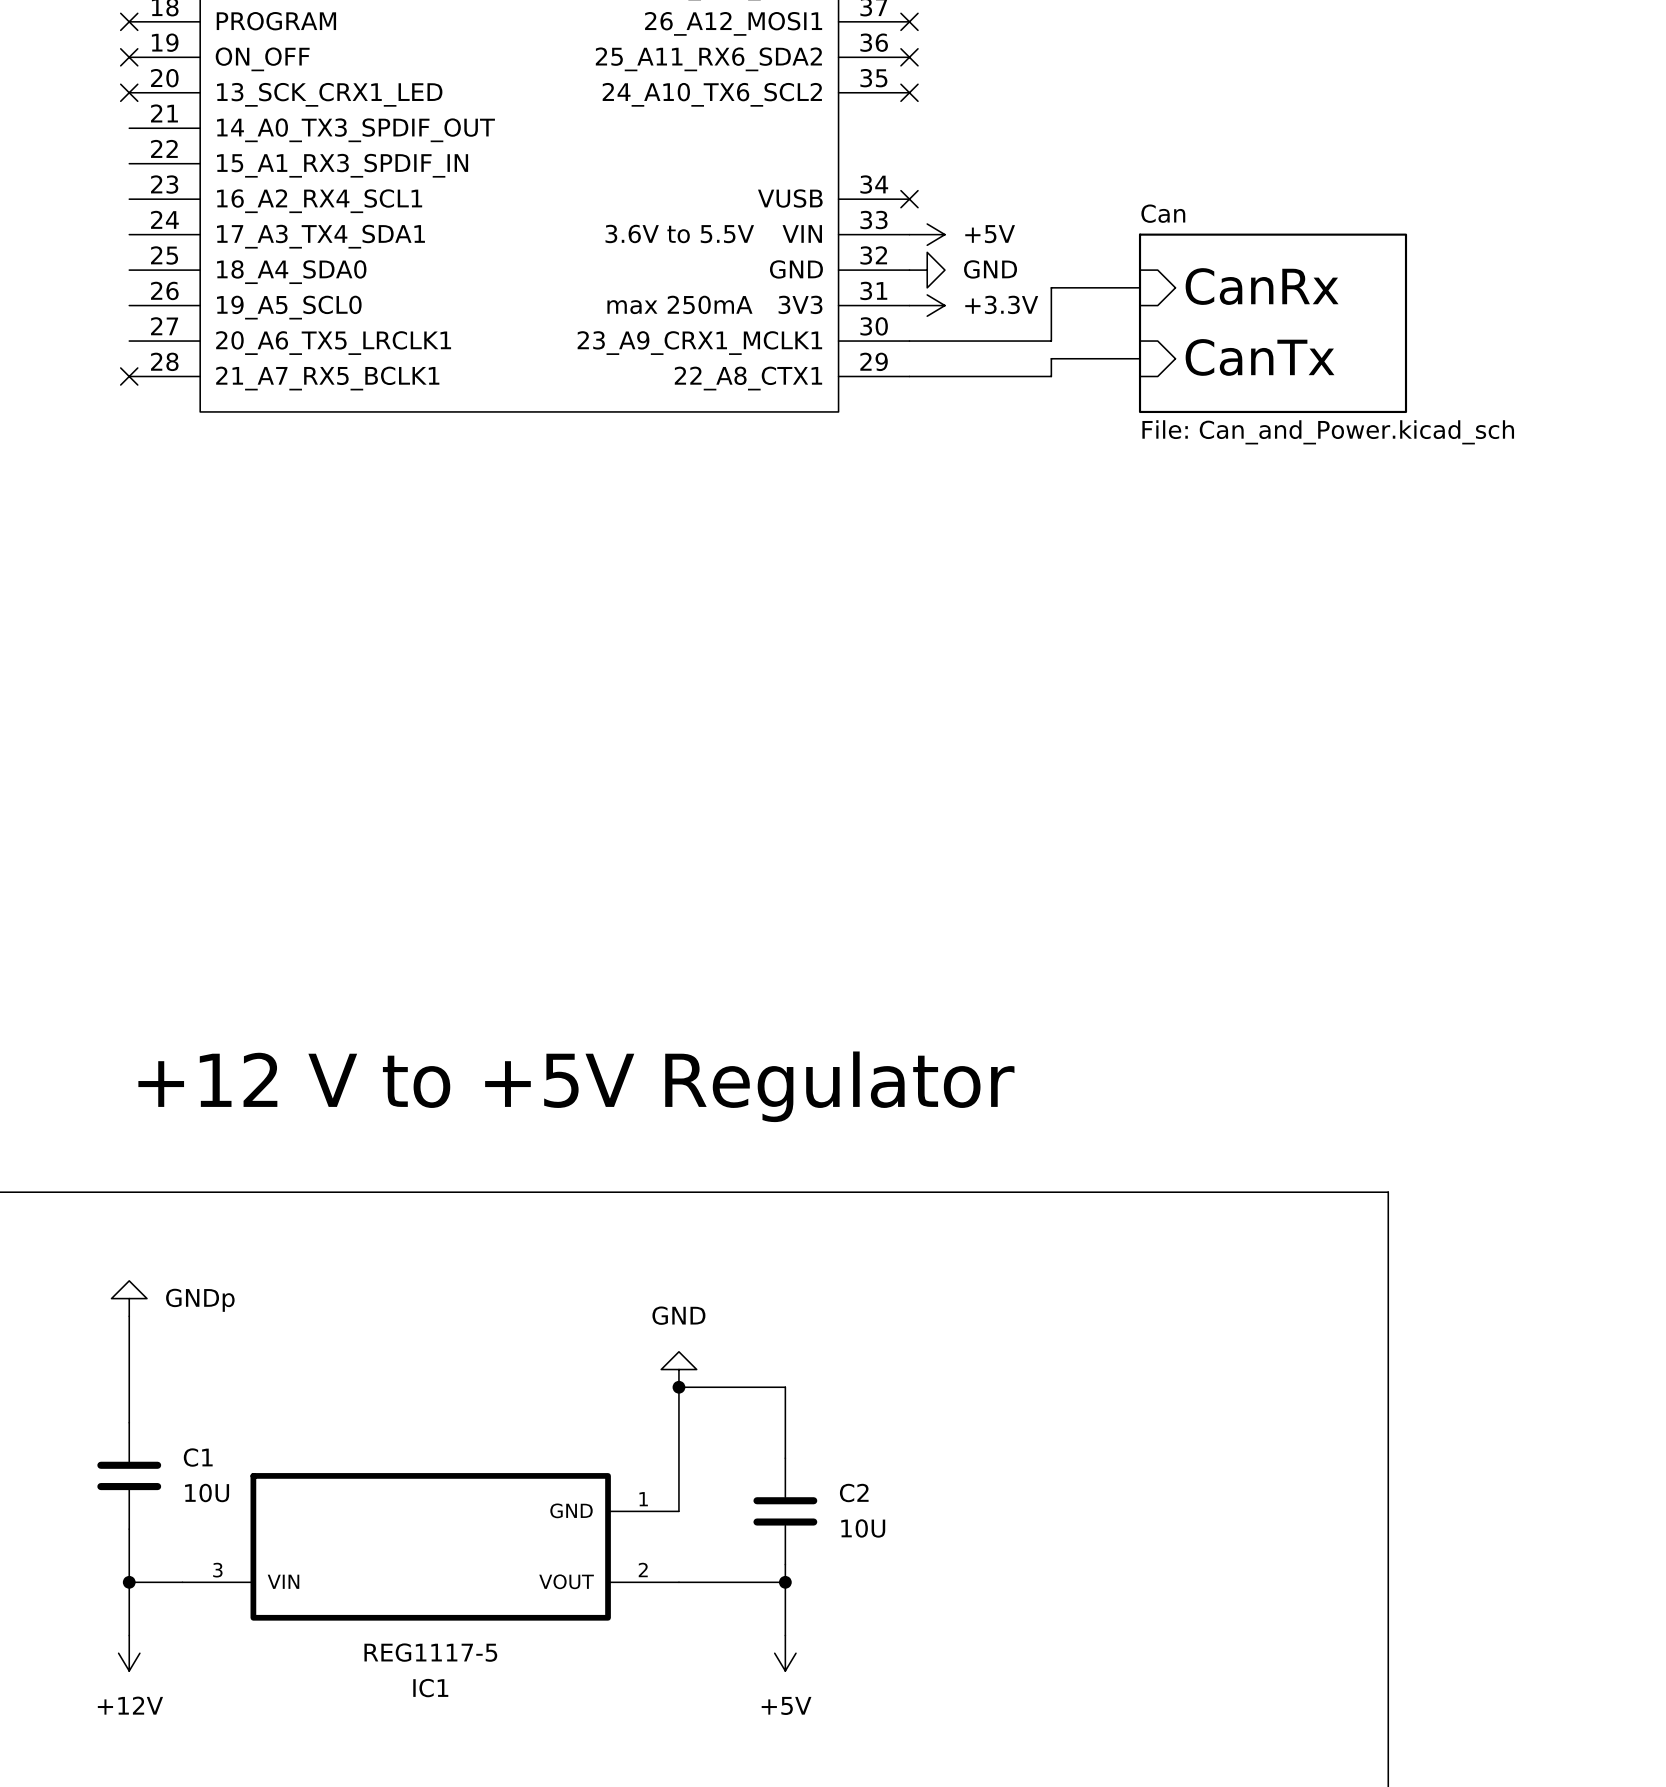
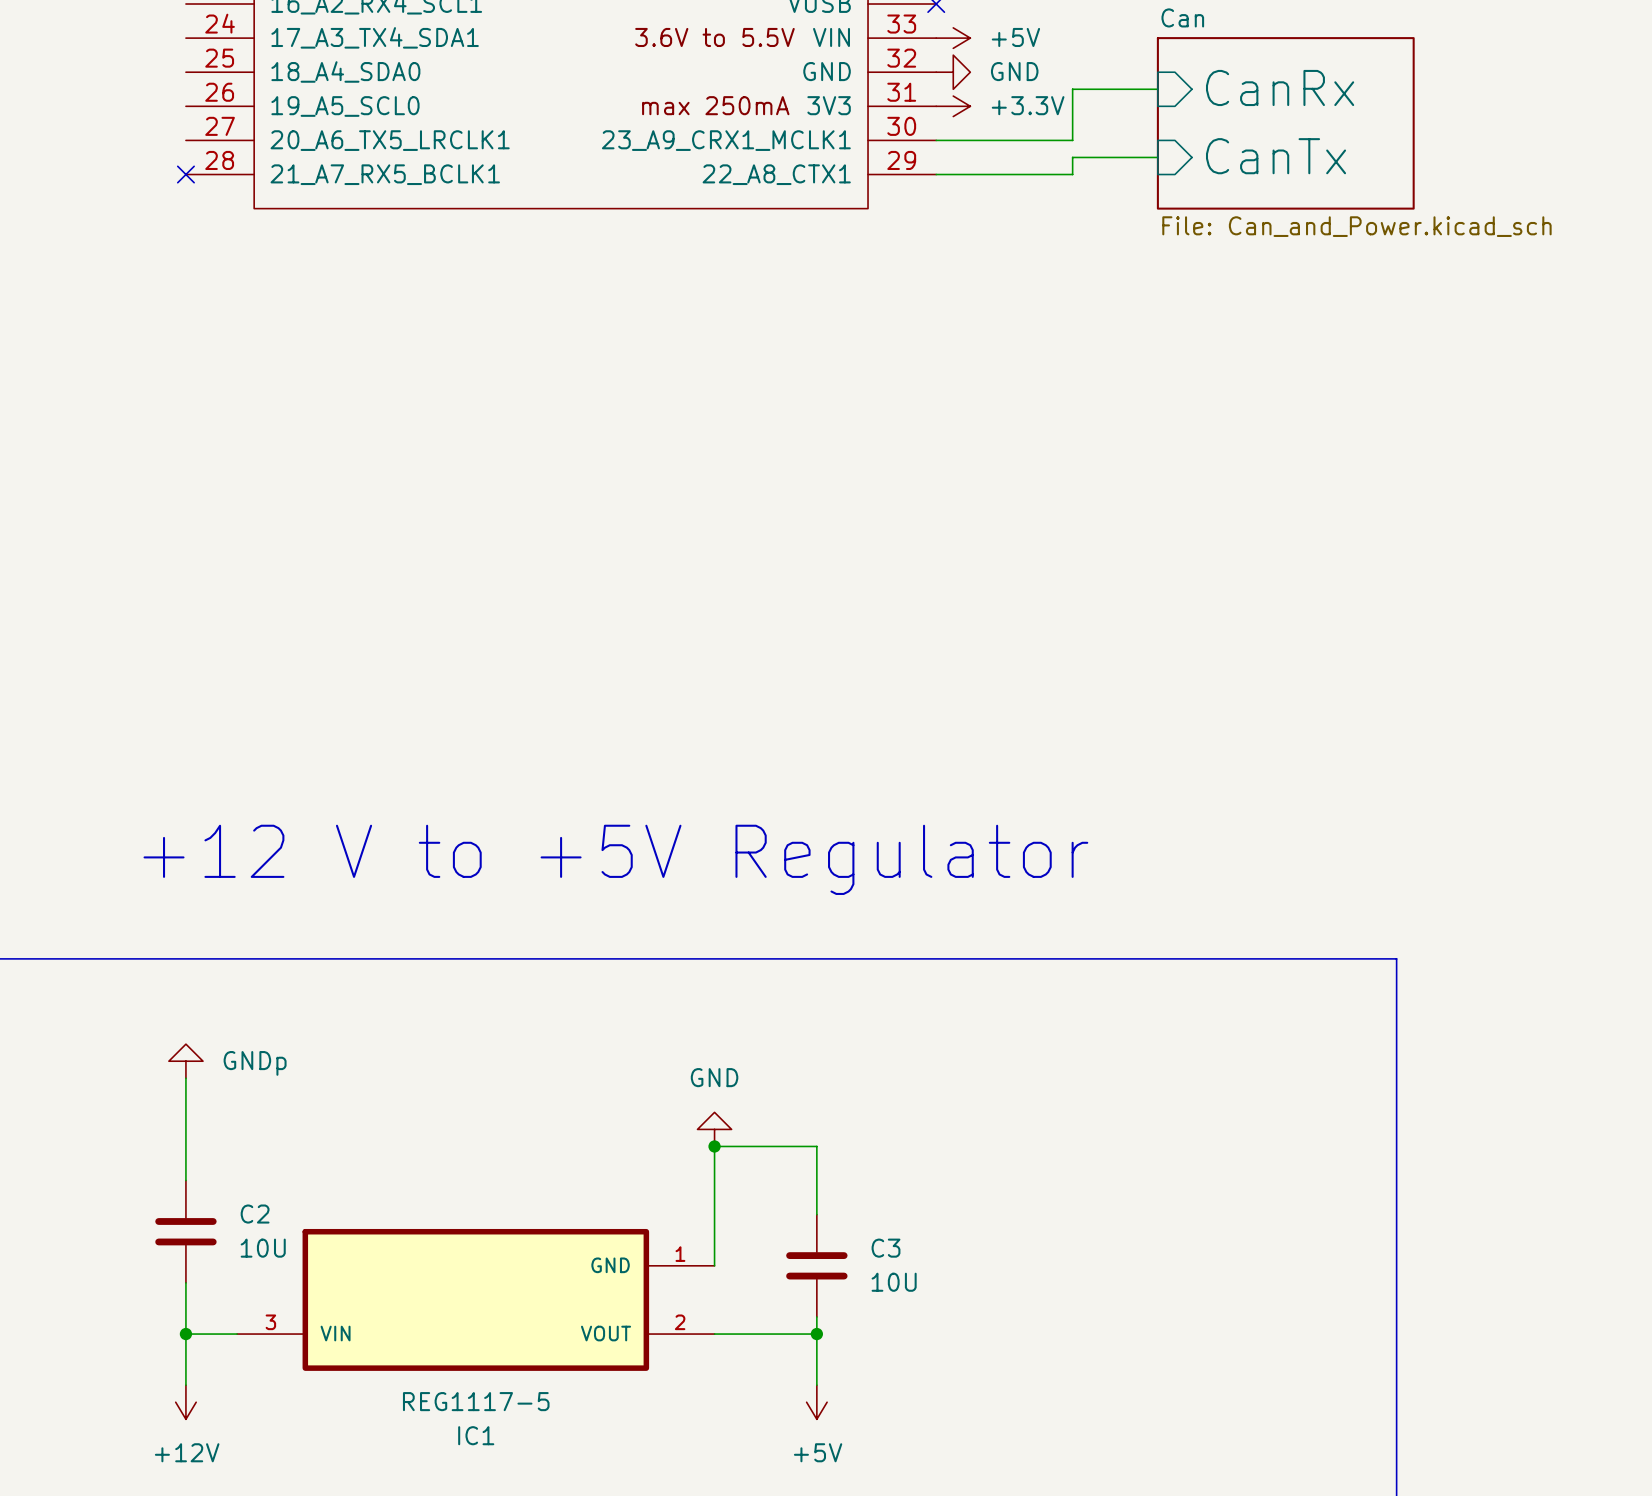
C1 name: C1 (198, 1457) -> C2 (255, 1214)
C2 name: C2 (854, 1493) -> C3 (886, 1248)

